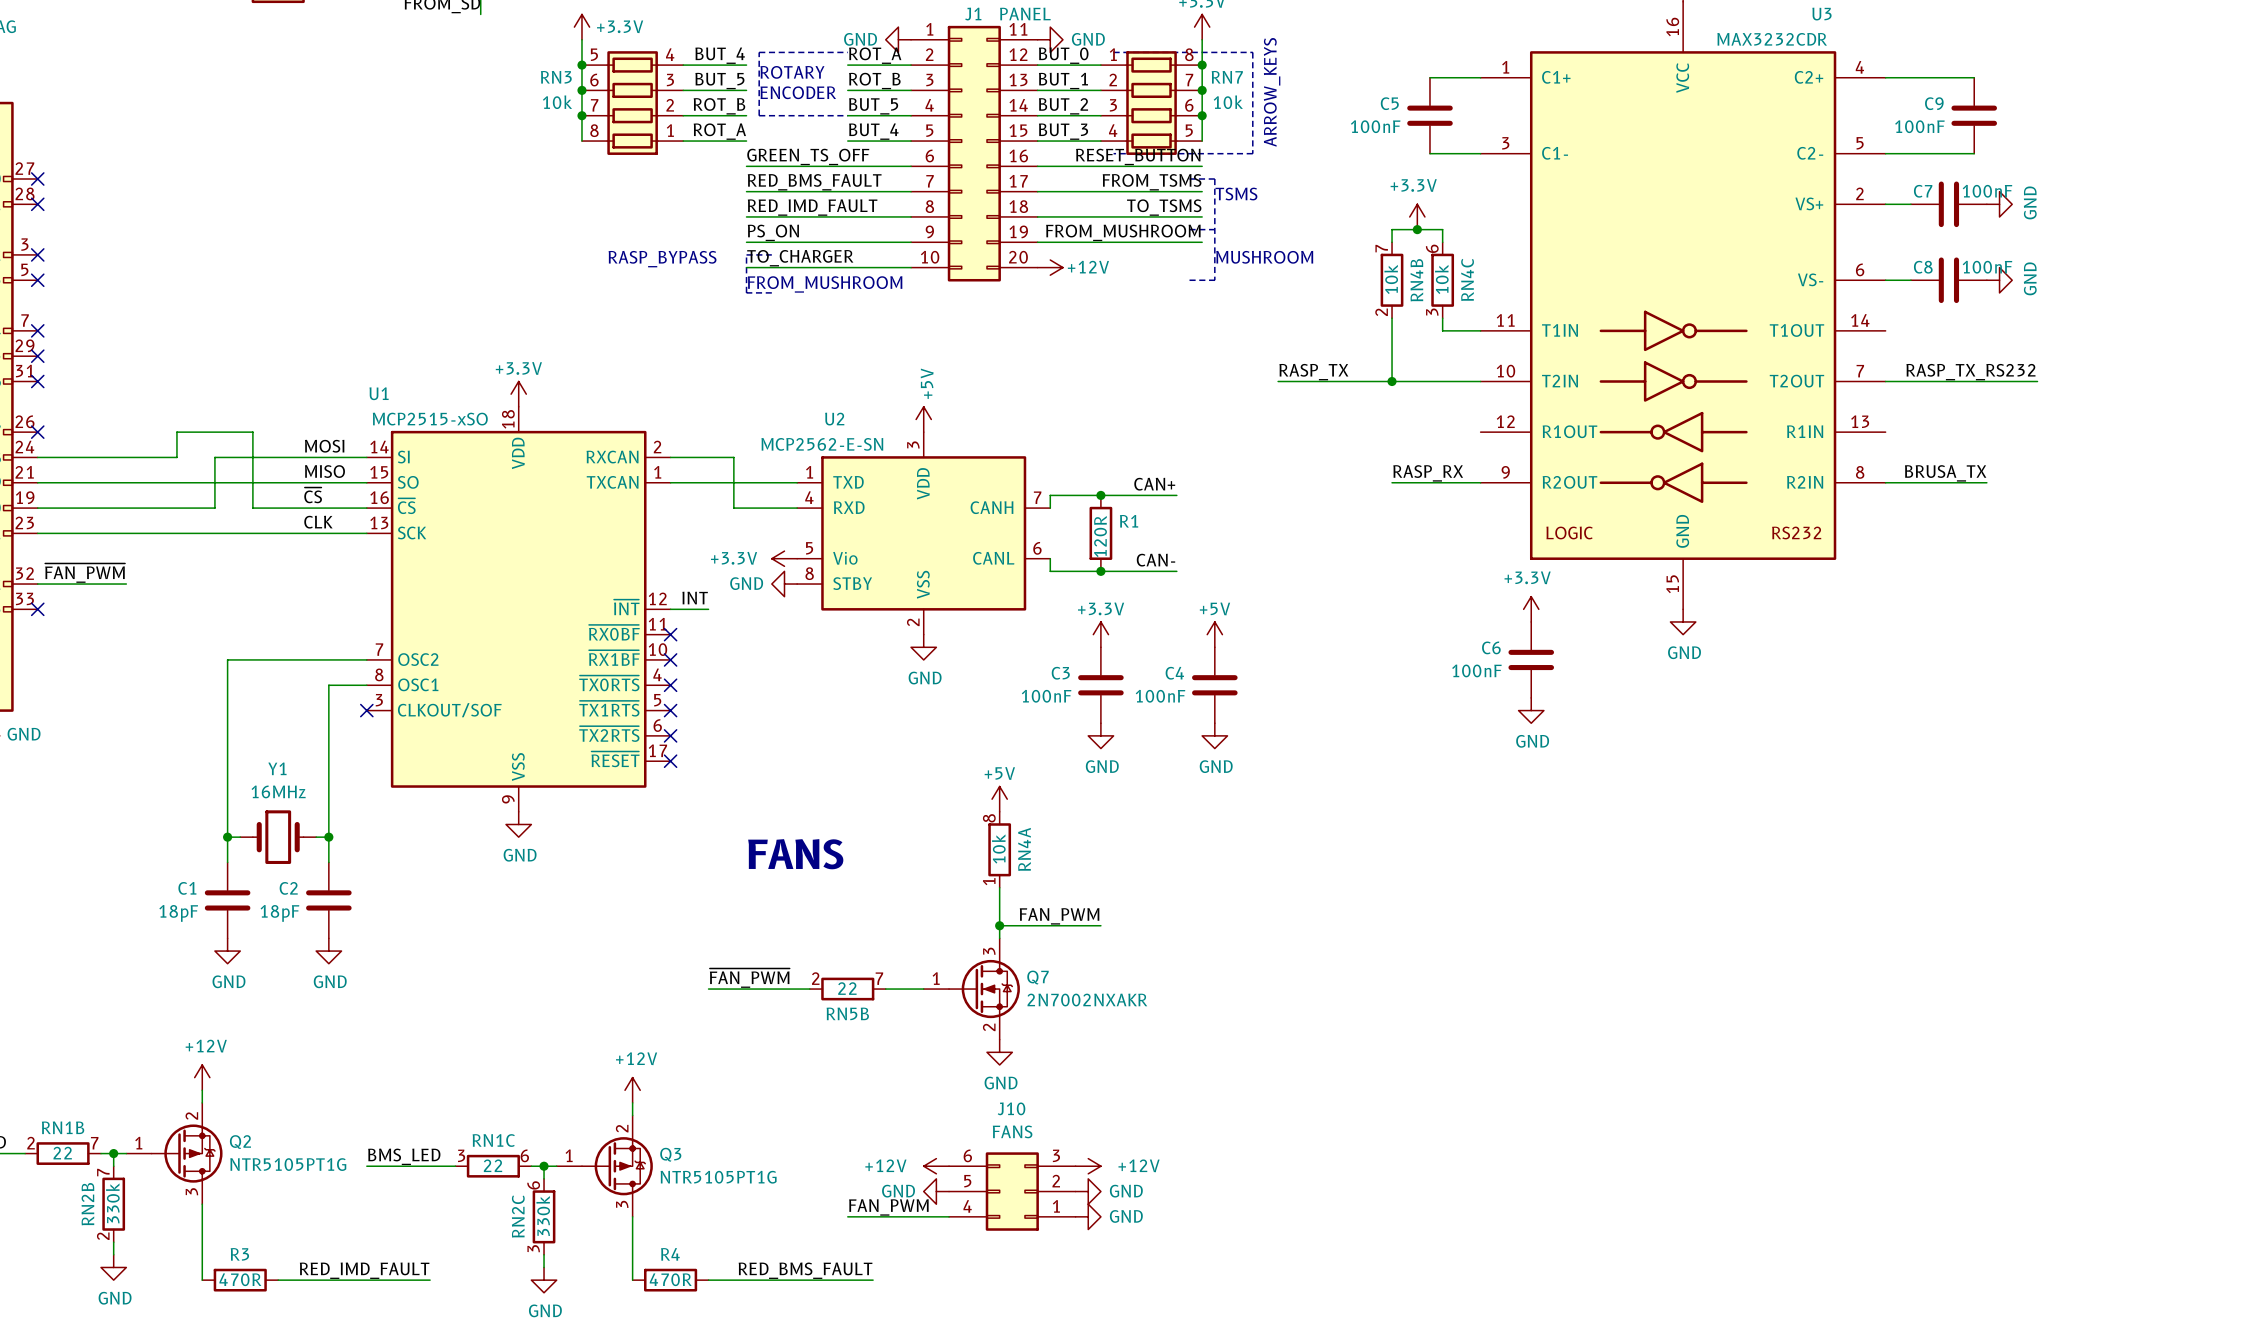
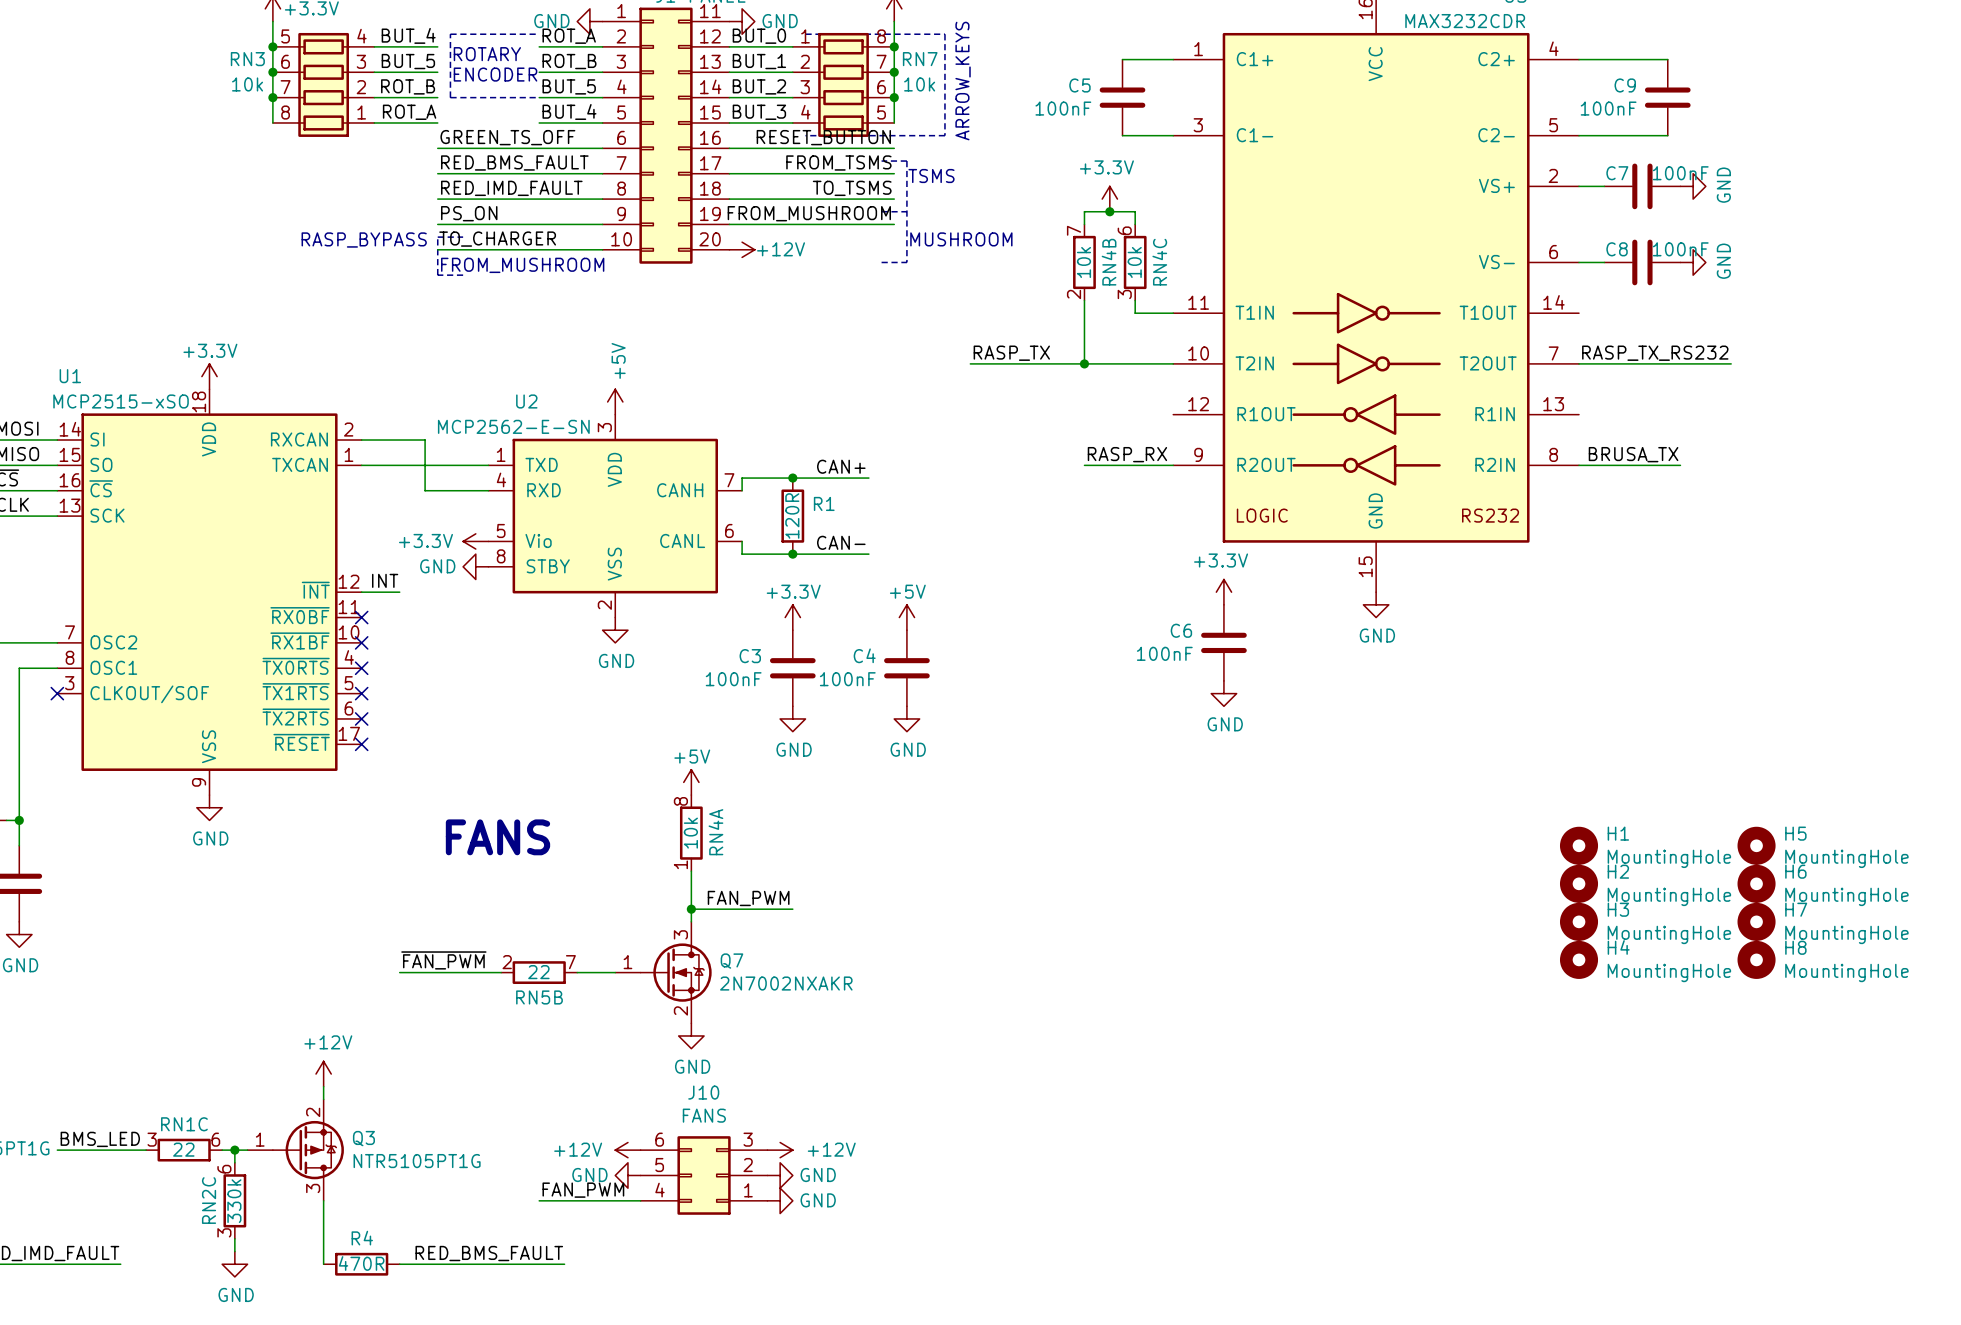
H1: none -> MountingHole (1579, 845)
H5: none -> MountingHole (1756, 845)
H2: none -> MountingHole (1579, 883)
H6: none -> MountingHole (1756, 883)
H3: none -> MountingHole (1579, 921)
H7: none -> MountingHole (1756, 921)
H4: none -> MountingHole (1579, 959)
H8: none -> MountingHole (1756, 959)

